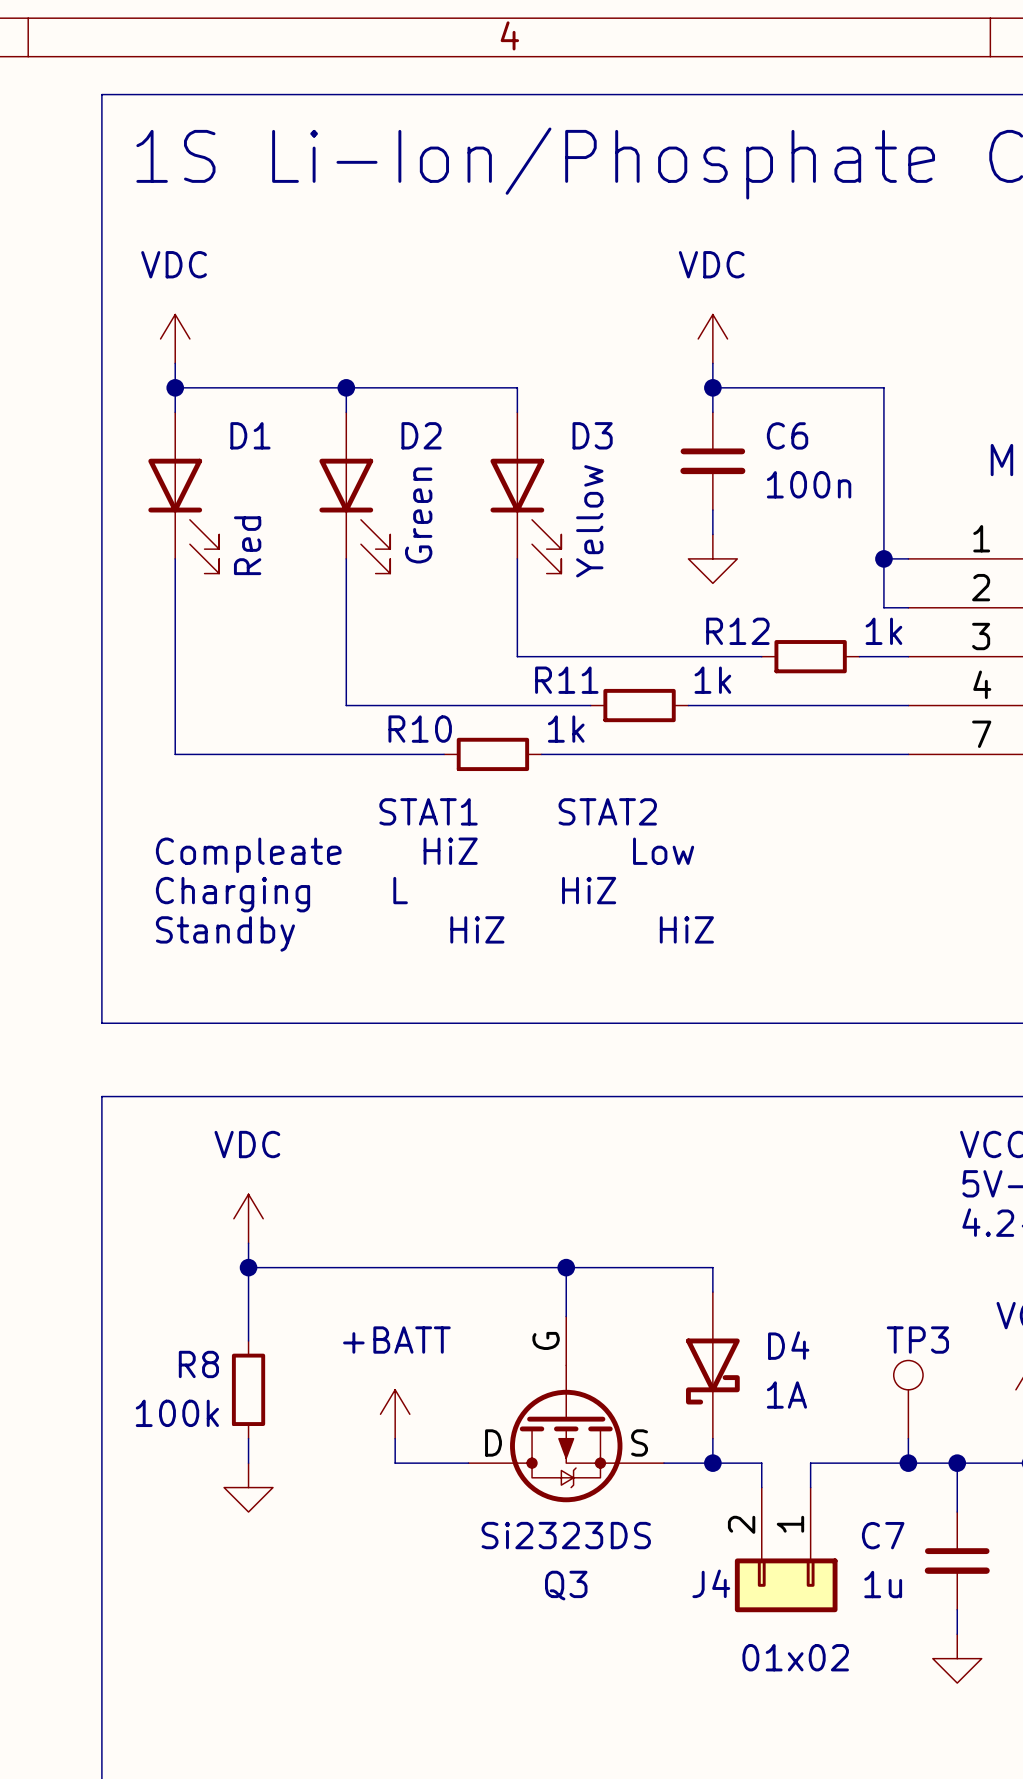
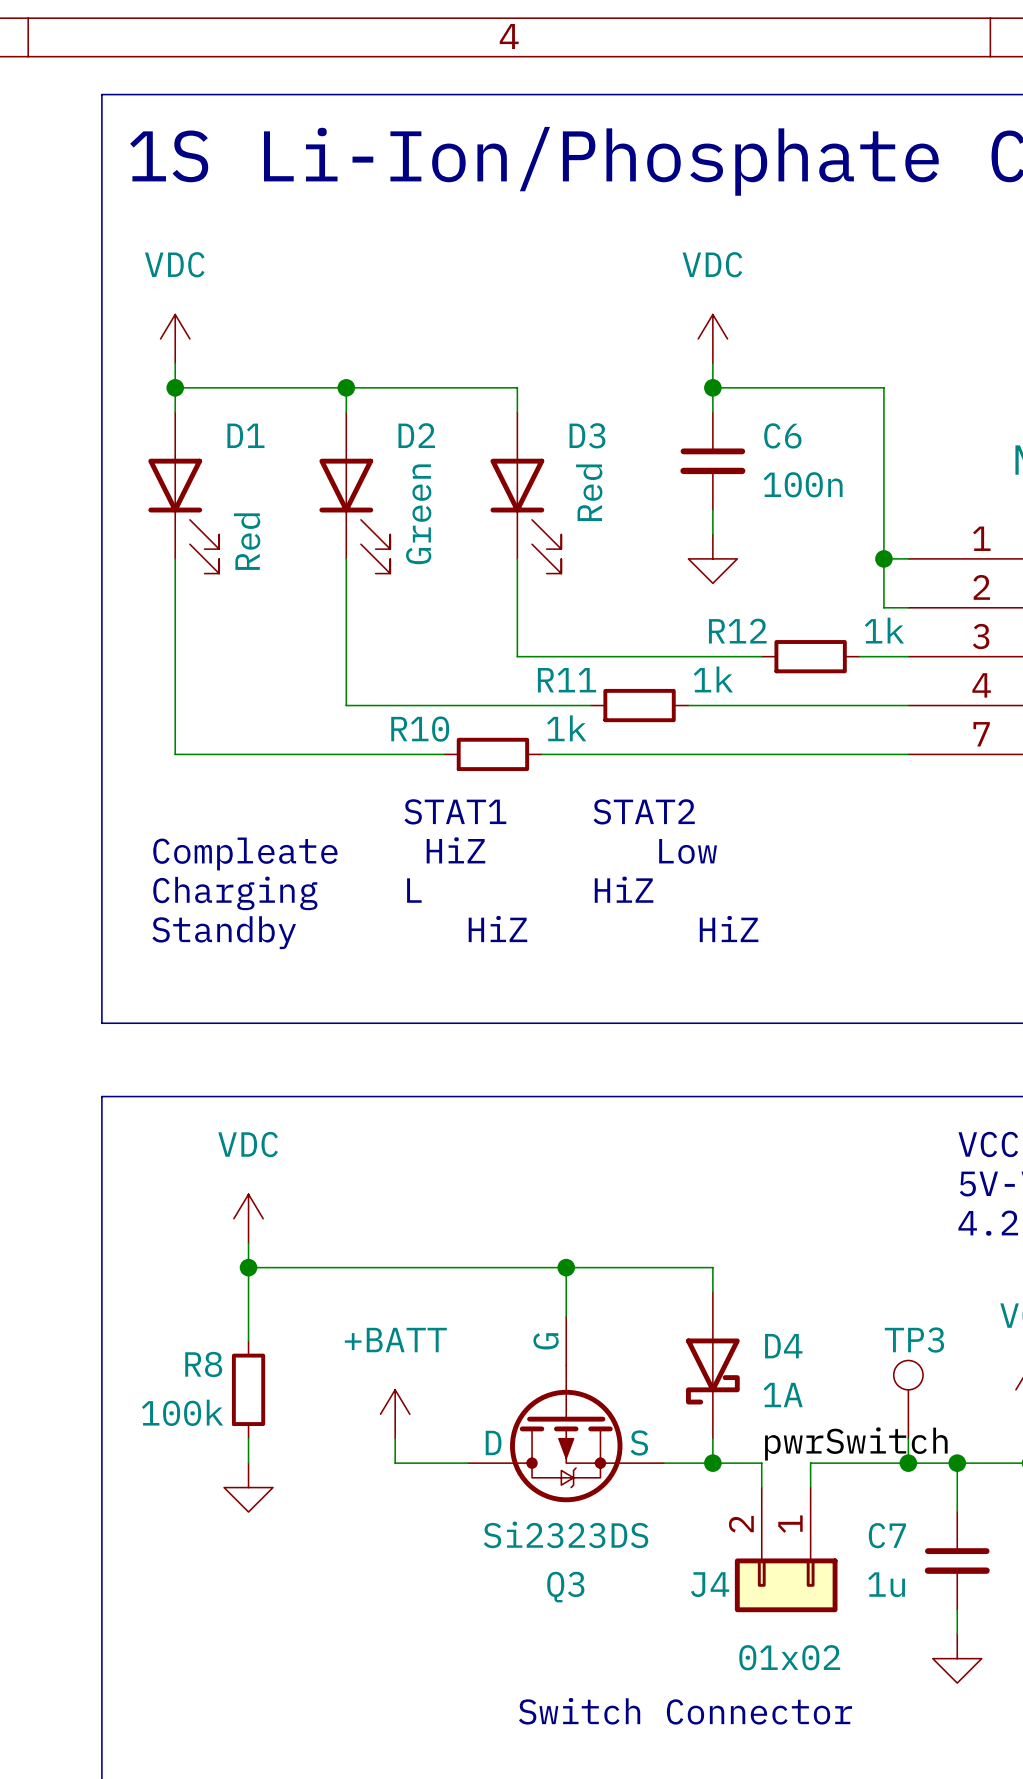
D3 value: Yellow (589, 521) -> Red (589, 492)
label: none -> pwrSwitch (856, 1443)
text: none -> Switch Connector (685, 1711)

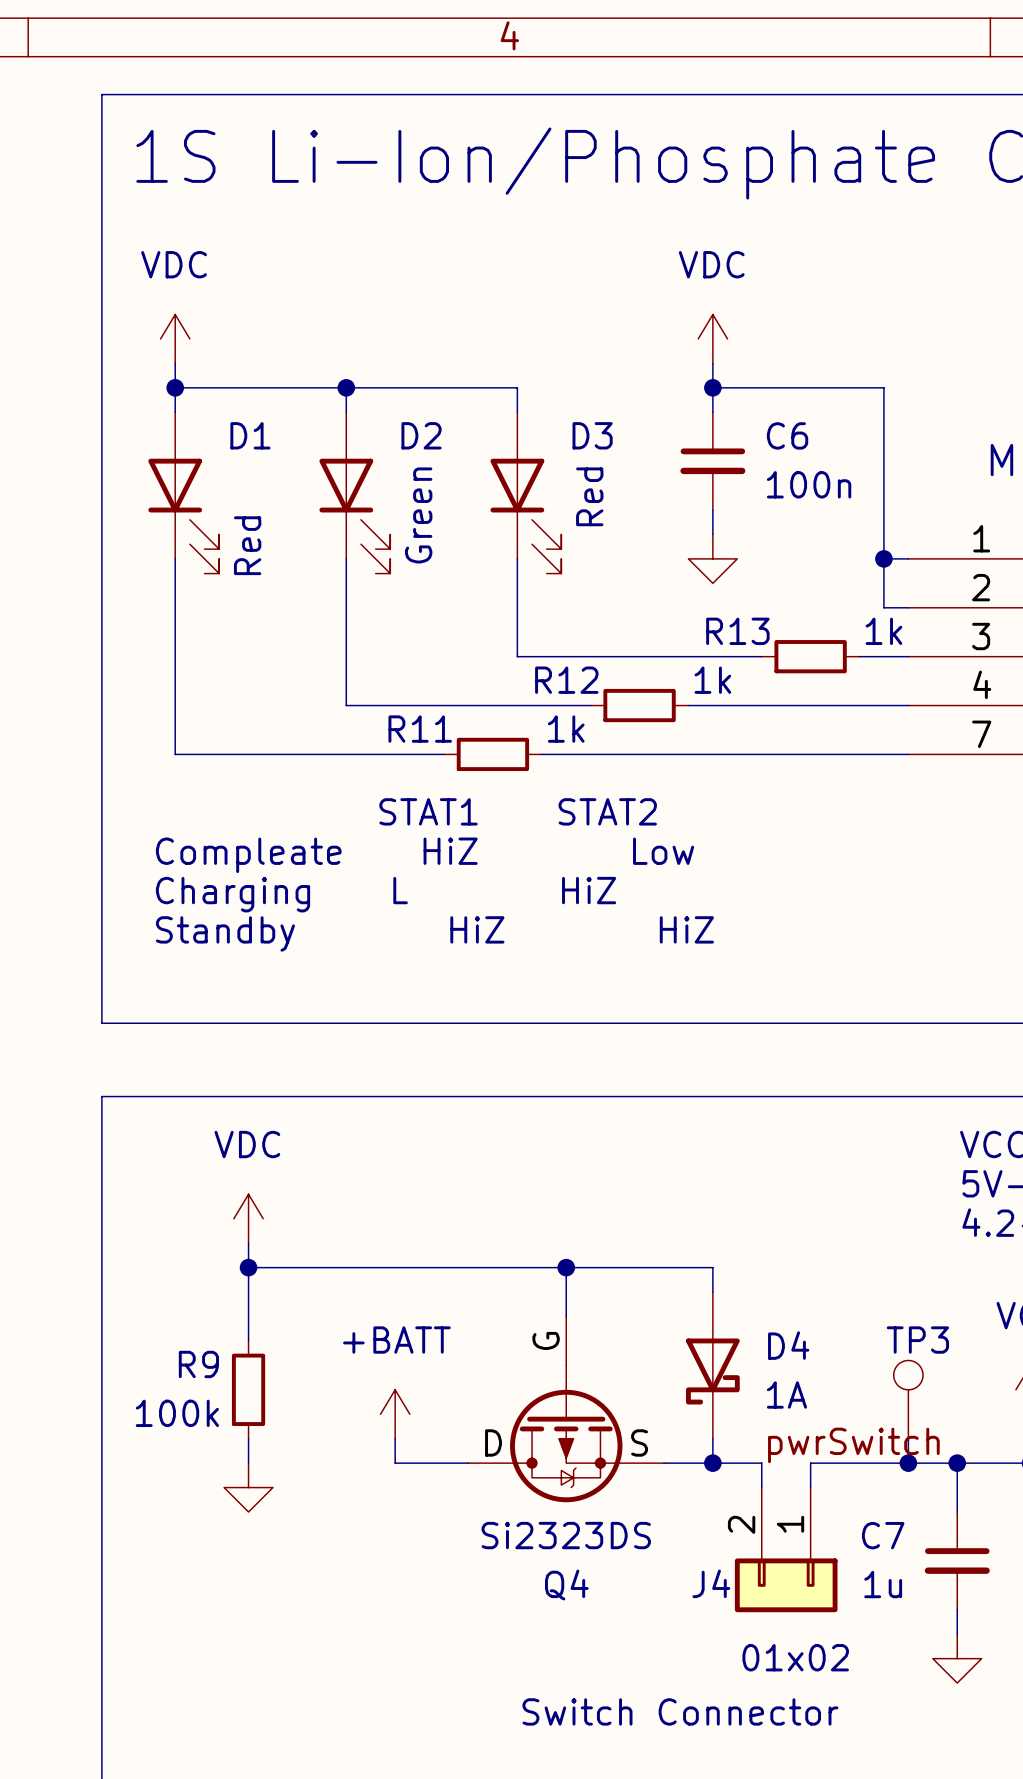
R12 name: R12 (737, 631) -> R13 (737, 631)
R11 name: R11 (566, 680) -> R12 (566, 680)
R10 name: R10 (420, 729) -> R11 (420, 729)
R8 name: R8 (203, 1364) -> R9 (198, 1364)
Q3 name: Q3 (565, 1587) -> Q4 (566, 1585)

